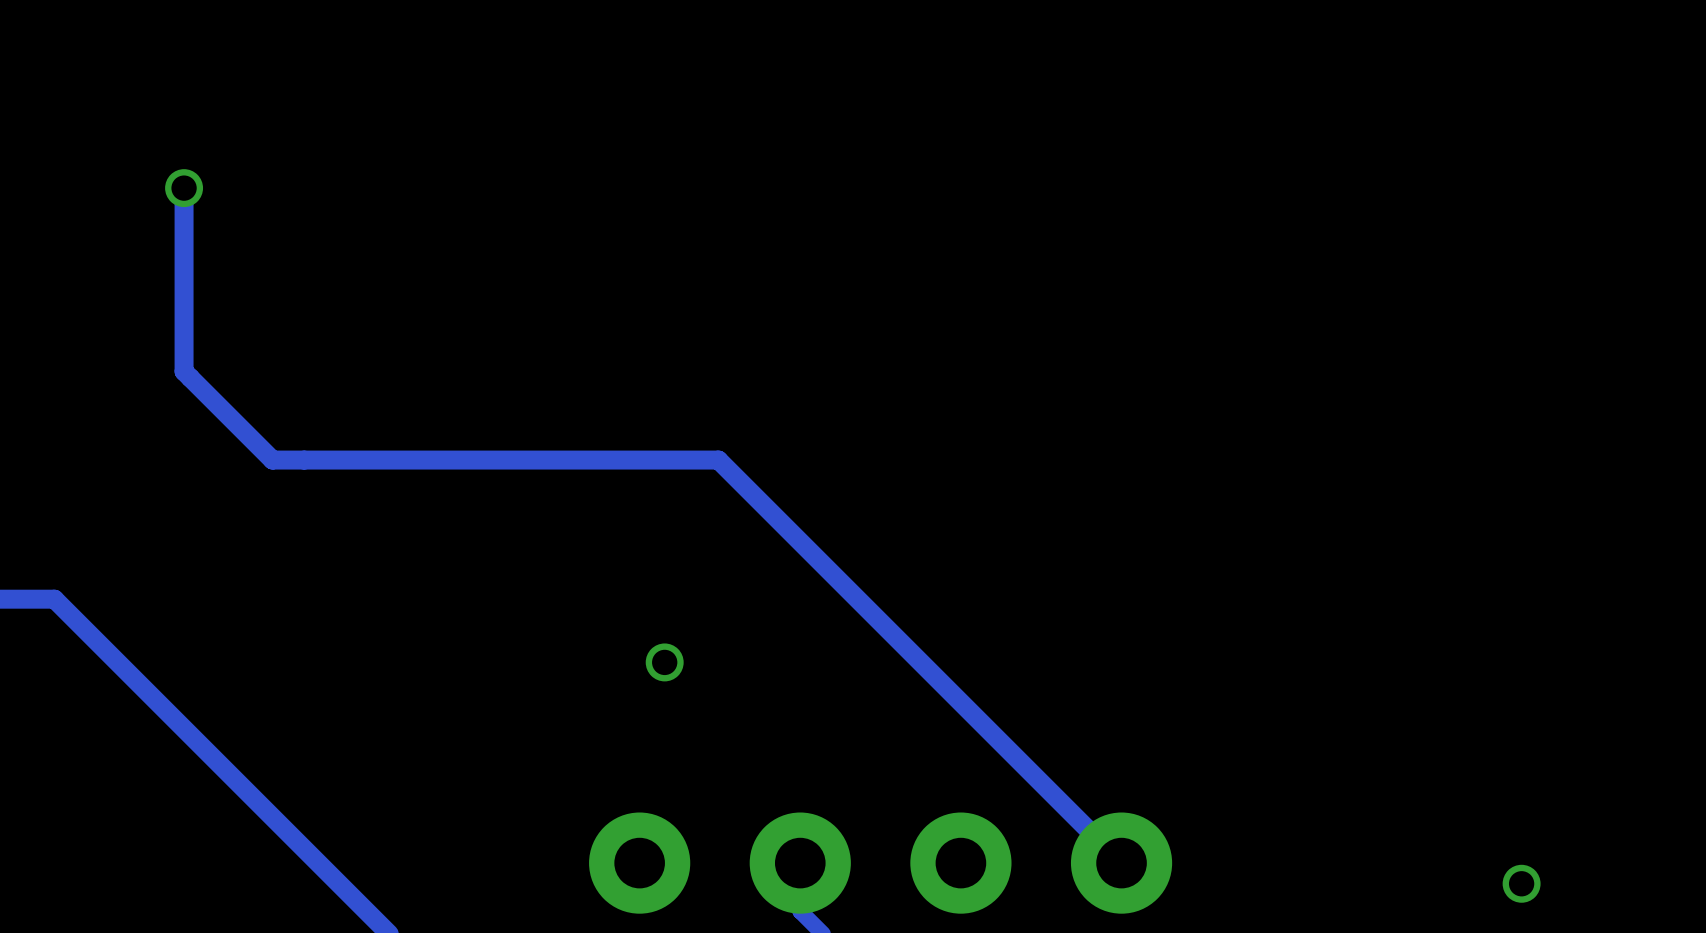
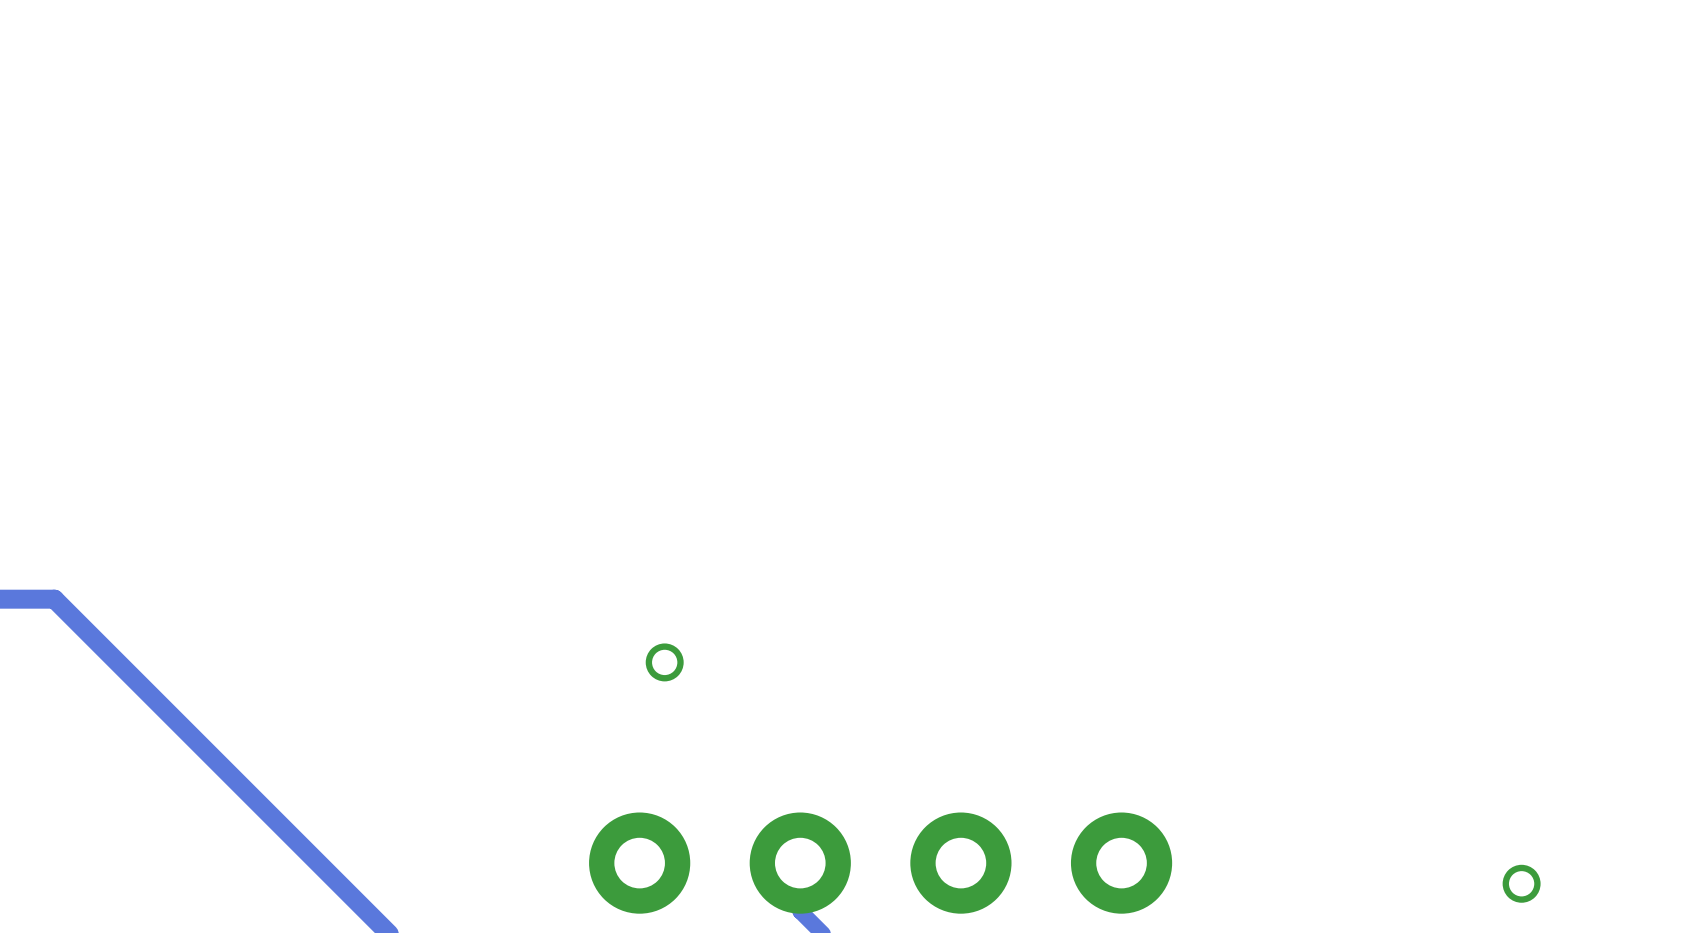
track: (184, 188) (184, 371) (272, 460) (718, 460) (1121, 863) -> none
via: (184, 188) -> none

